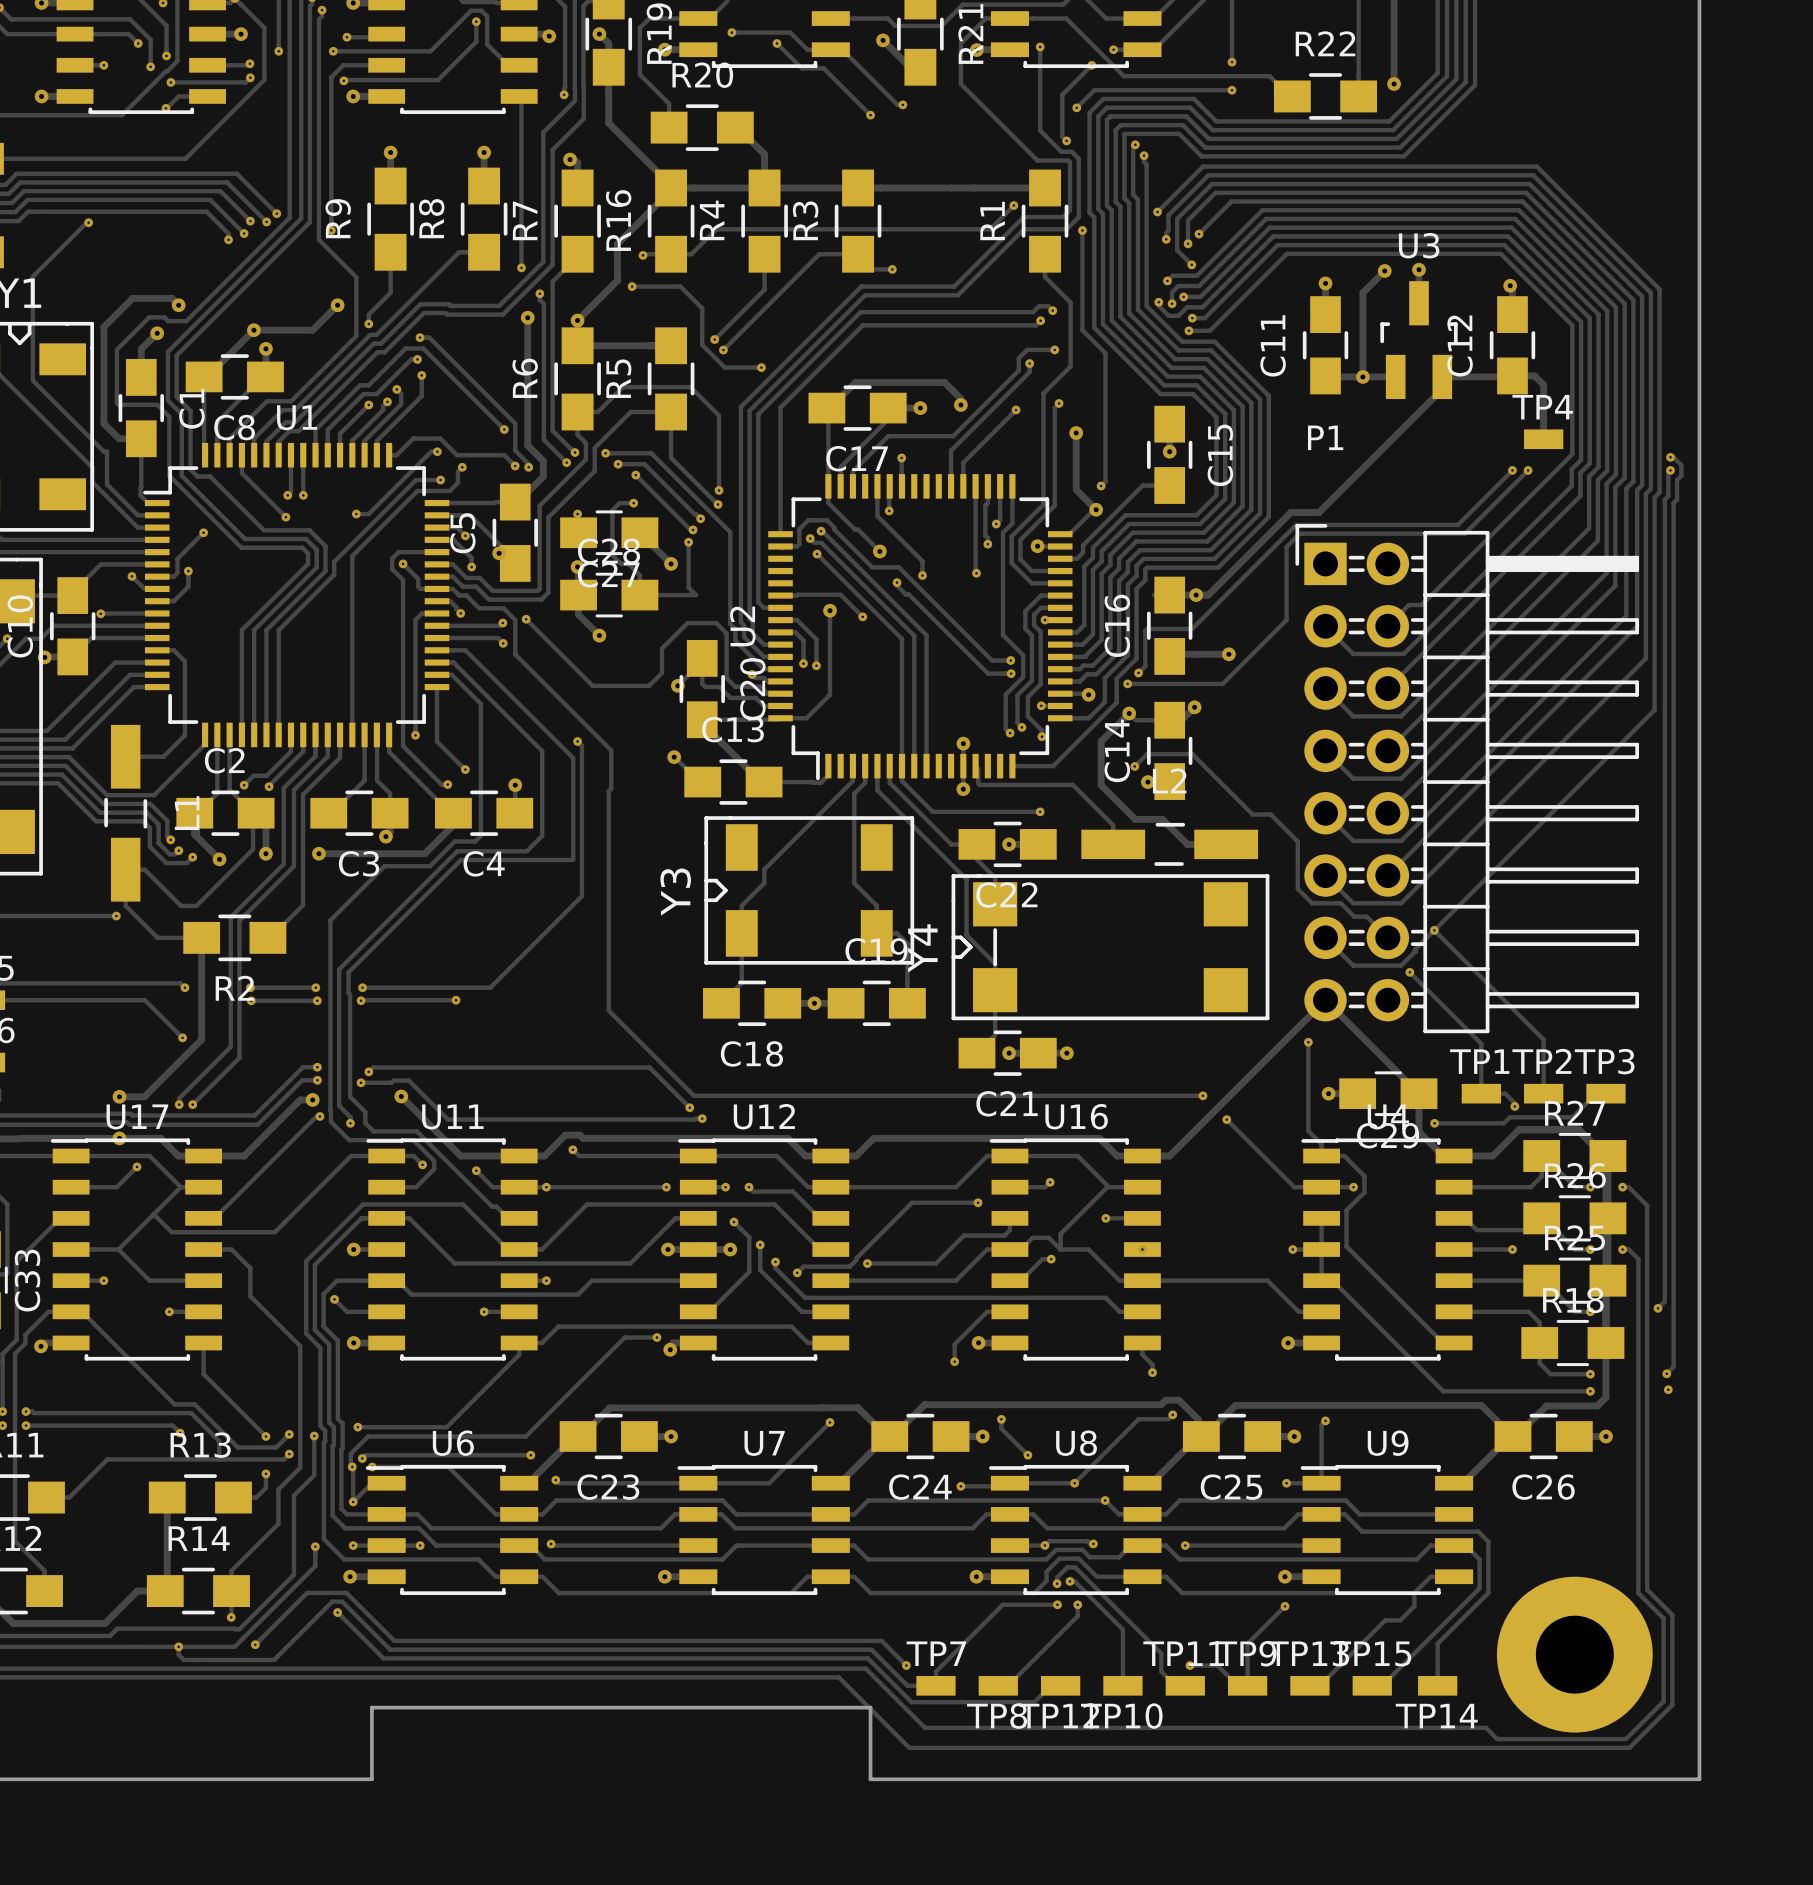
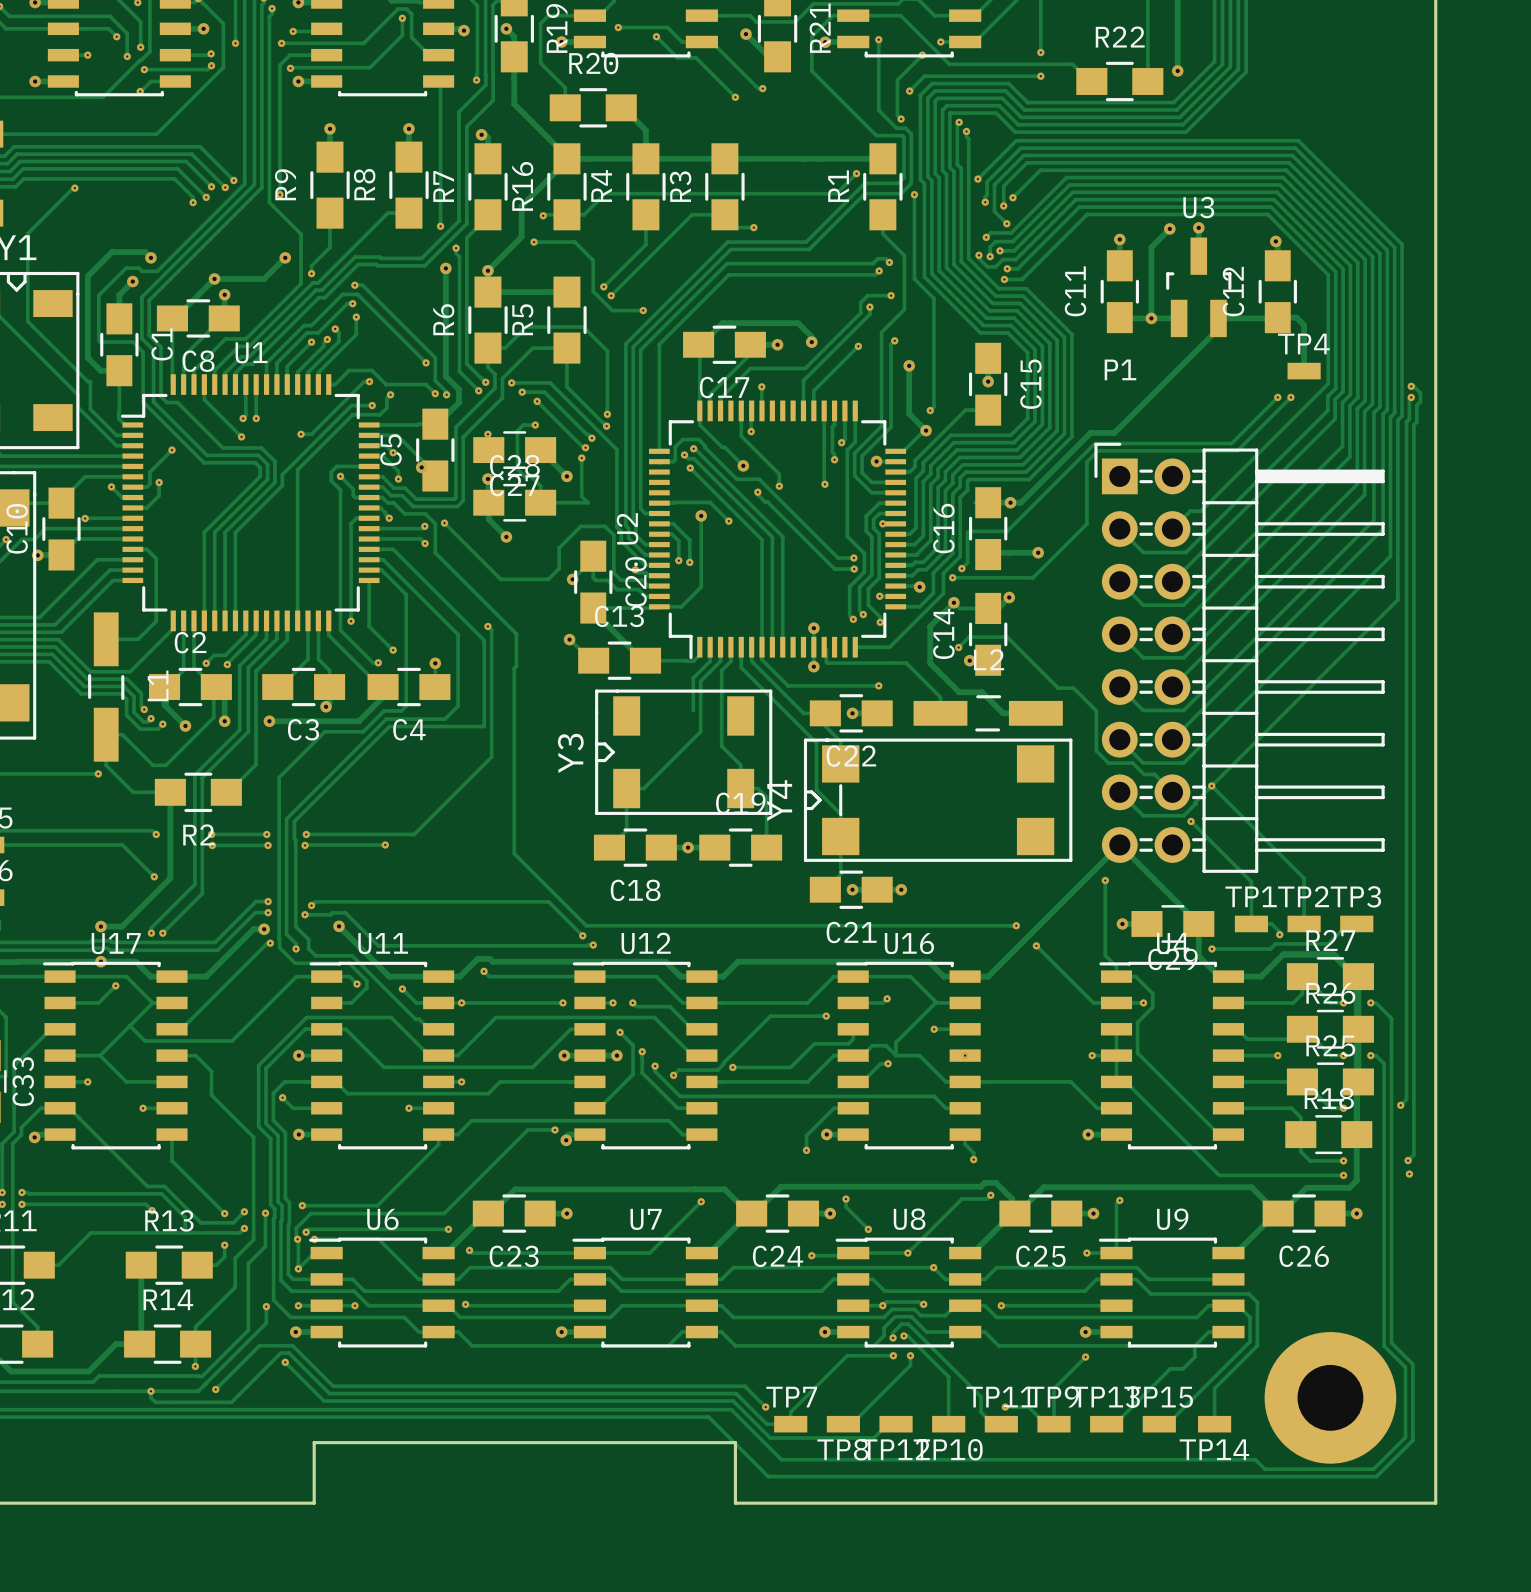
track: none -> (710, 647) (710, 661) (693, 678) (693, 710)
track: (852, 780) (764, 869) (764, 883) (741, 905) (741, 933) -> (720, 659) (700, 681) (700, 731) (643, 788) (626, 788)

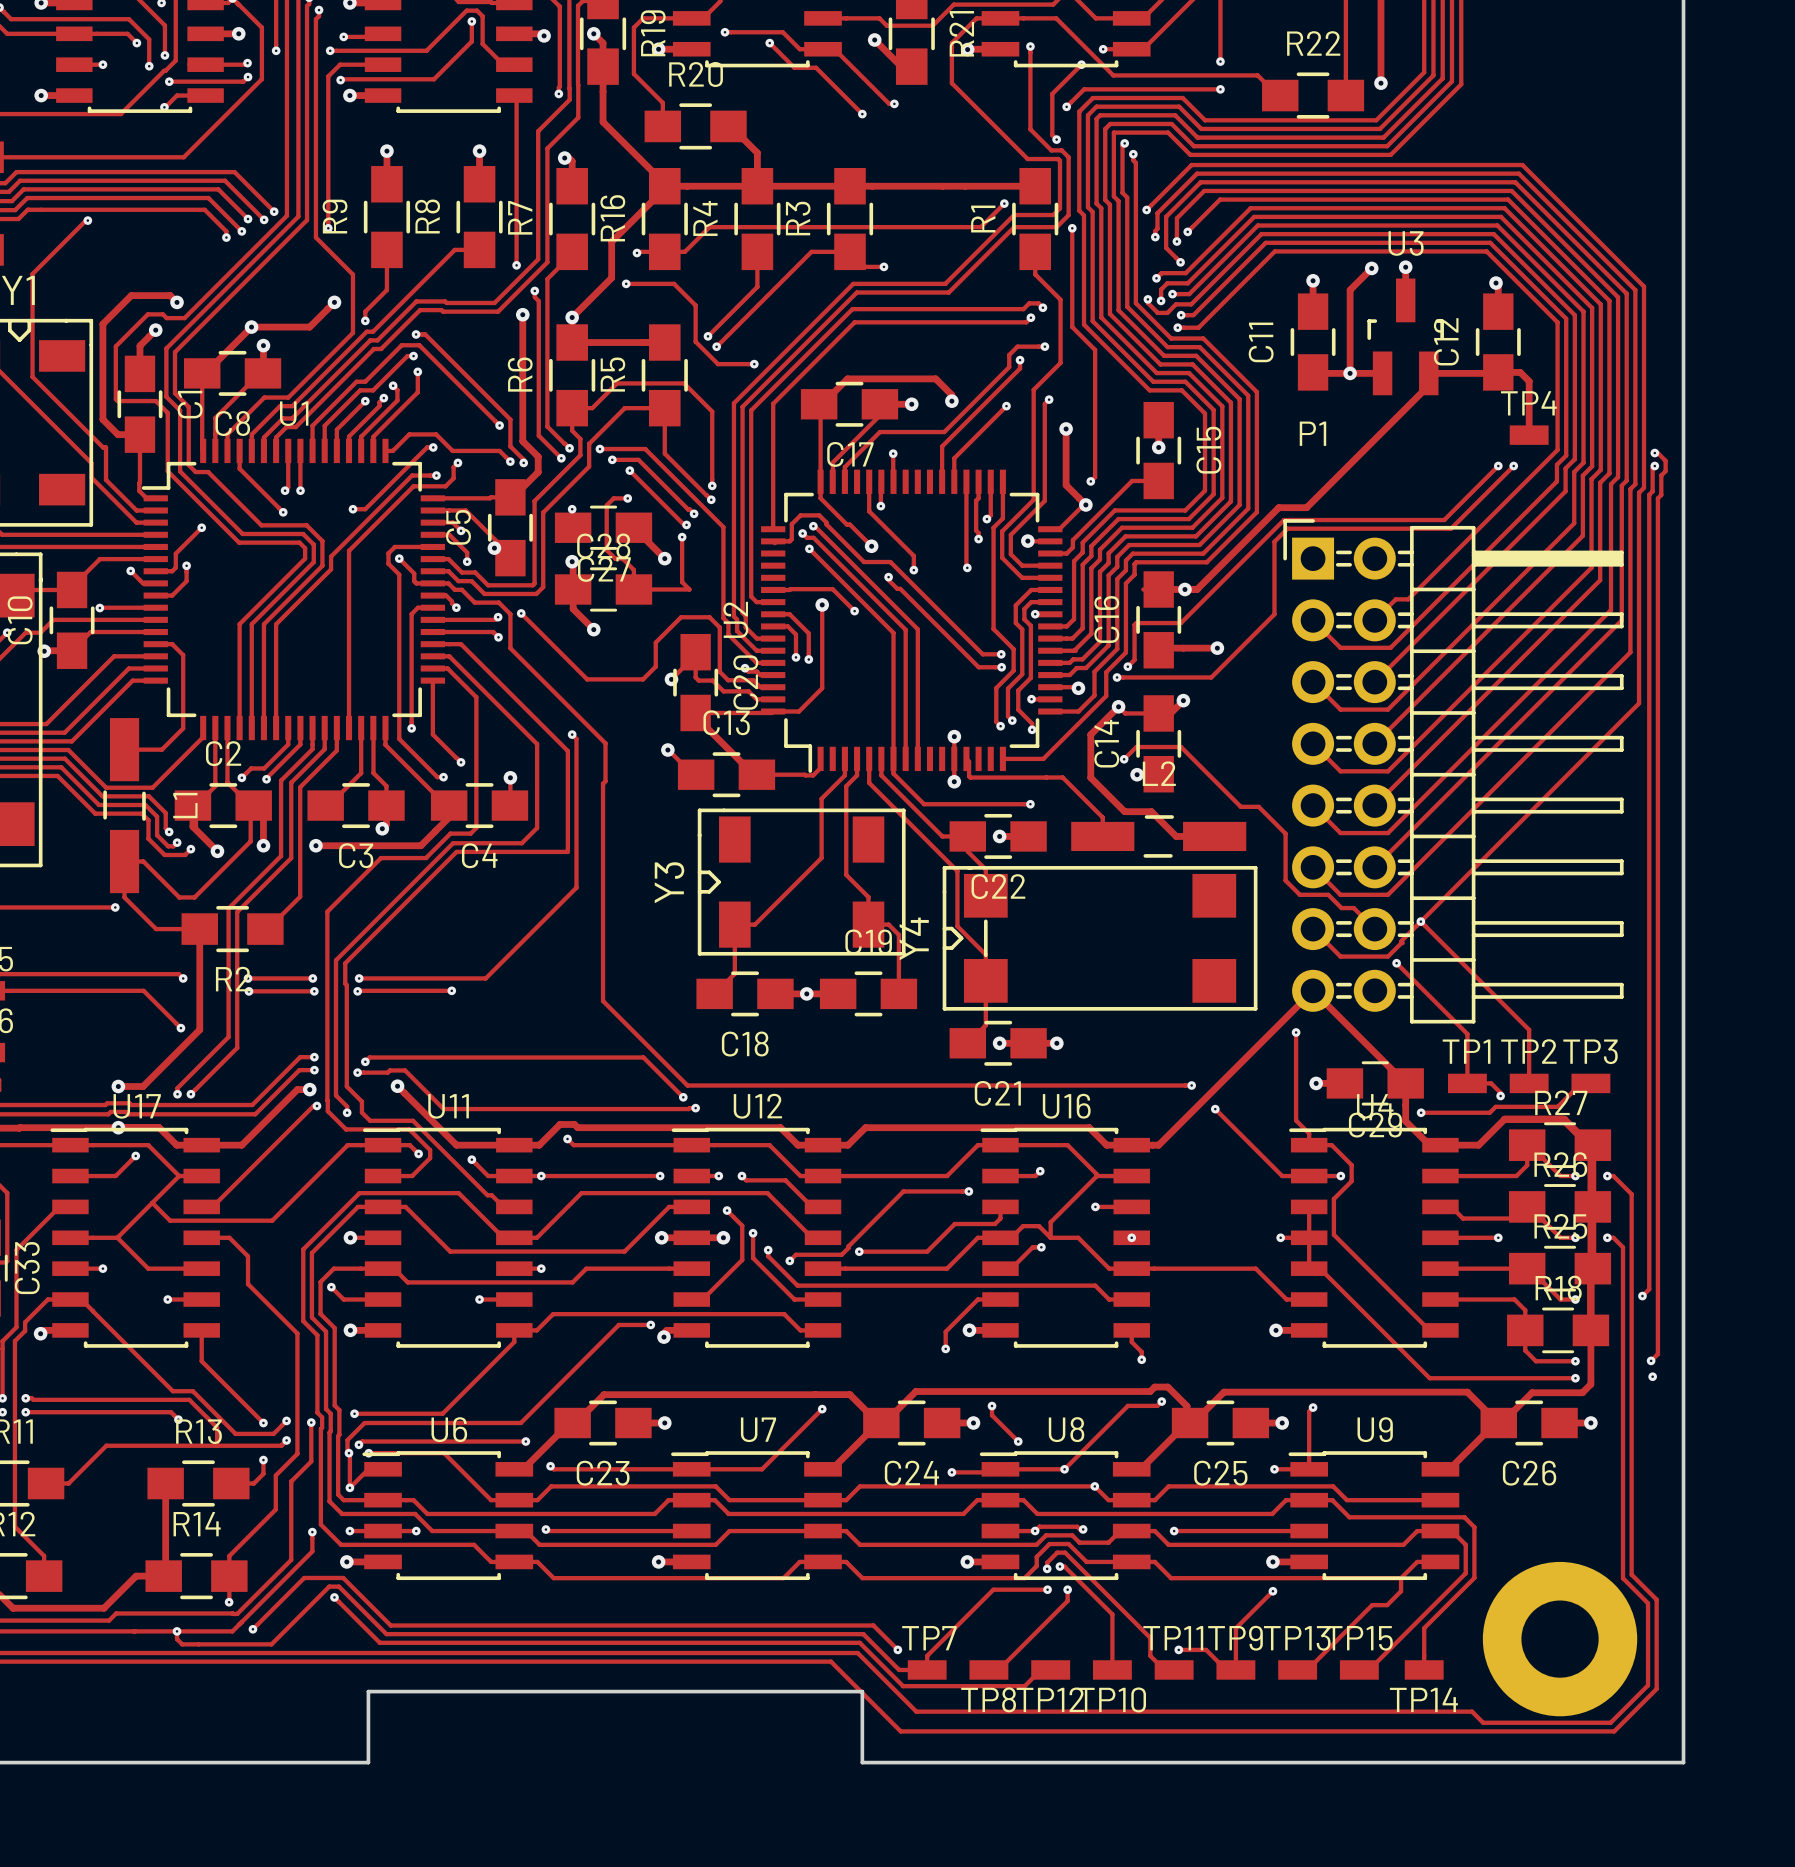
track: (710, 647) (710, 661) (693, 678) (693, 710) -> none

